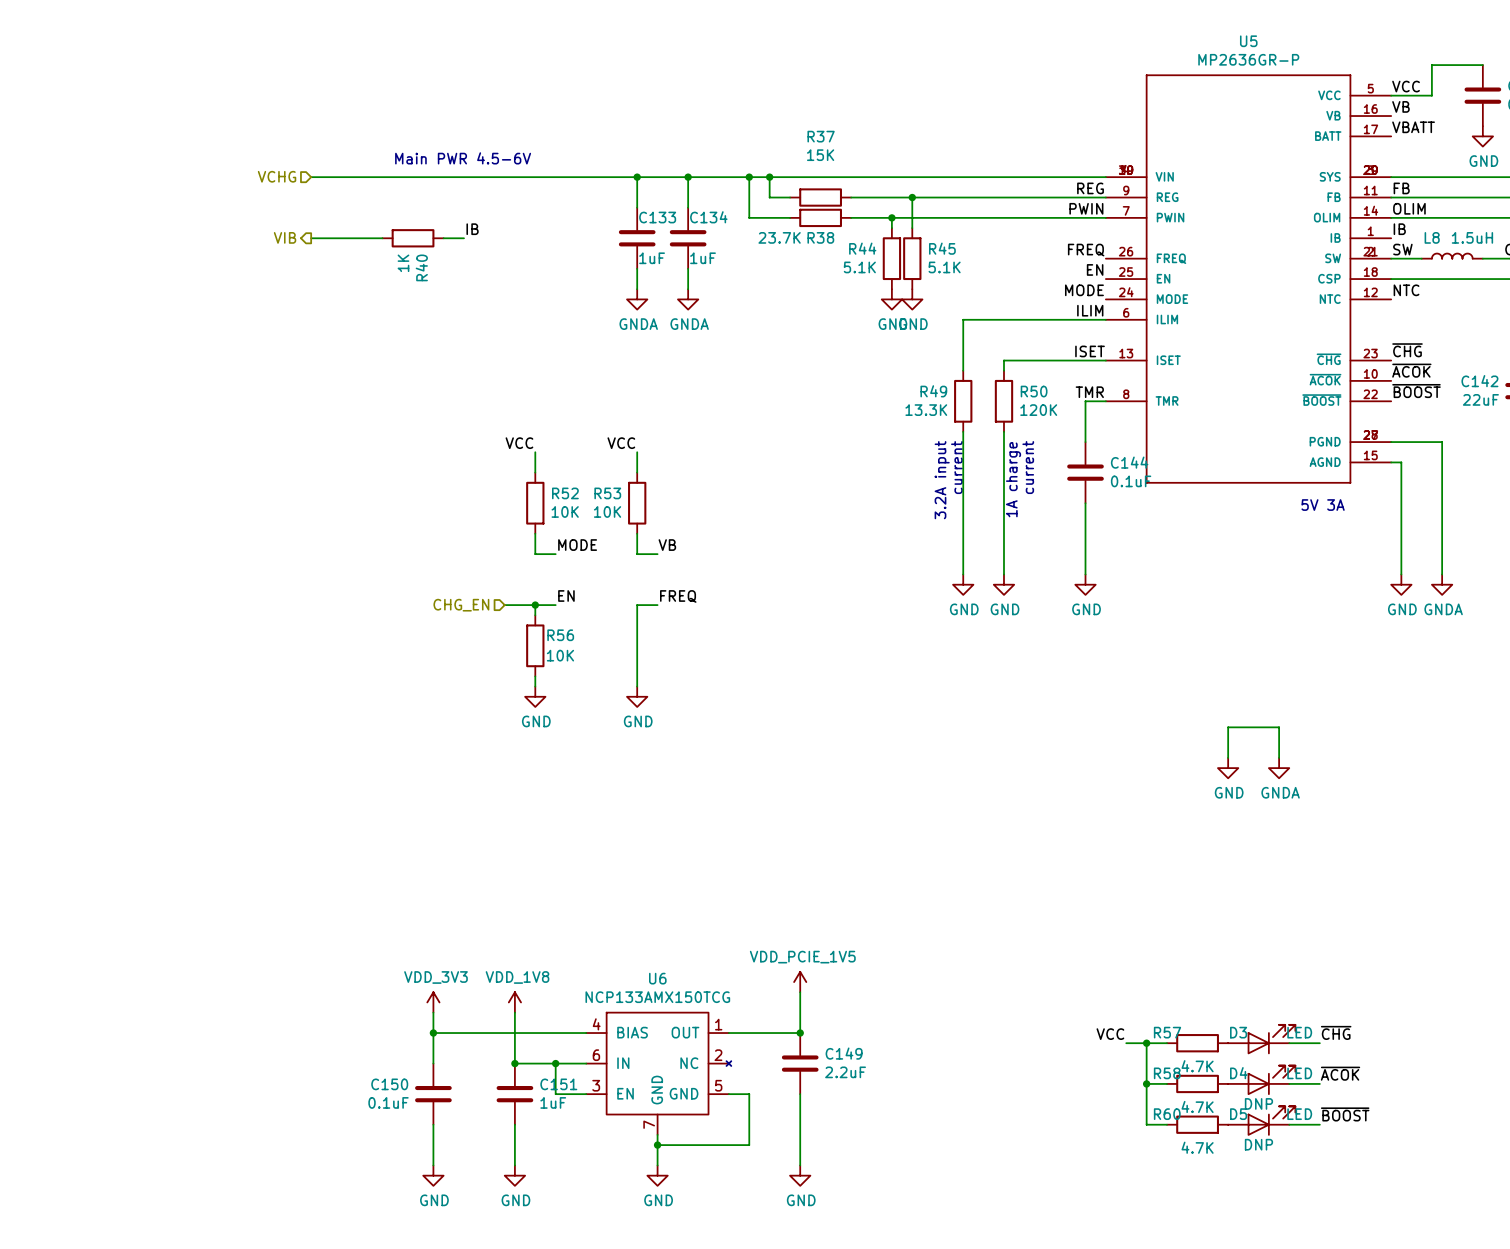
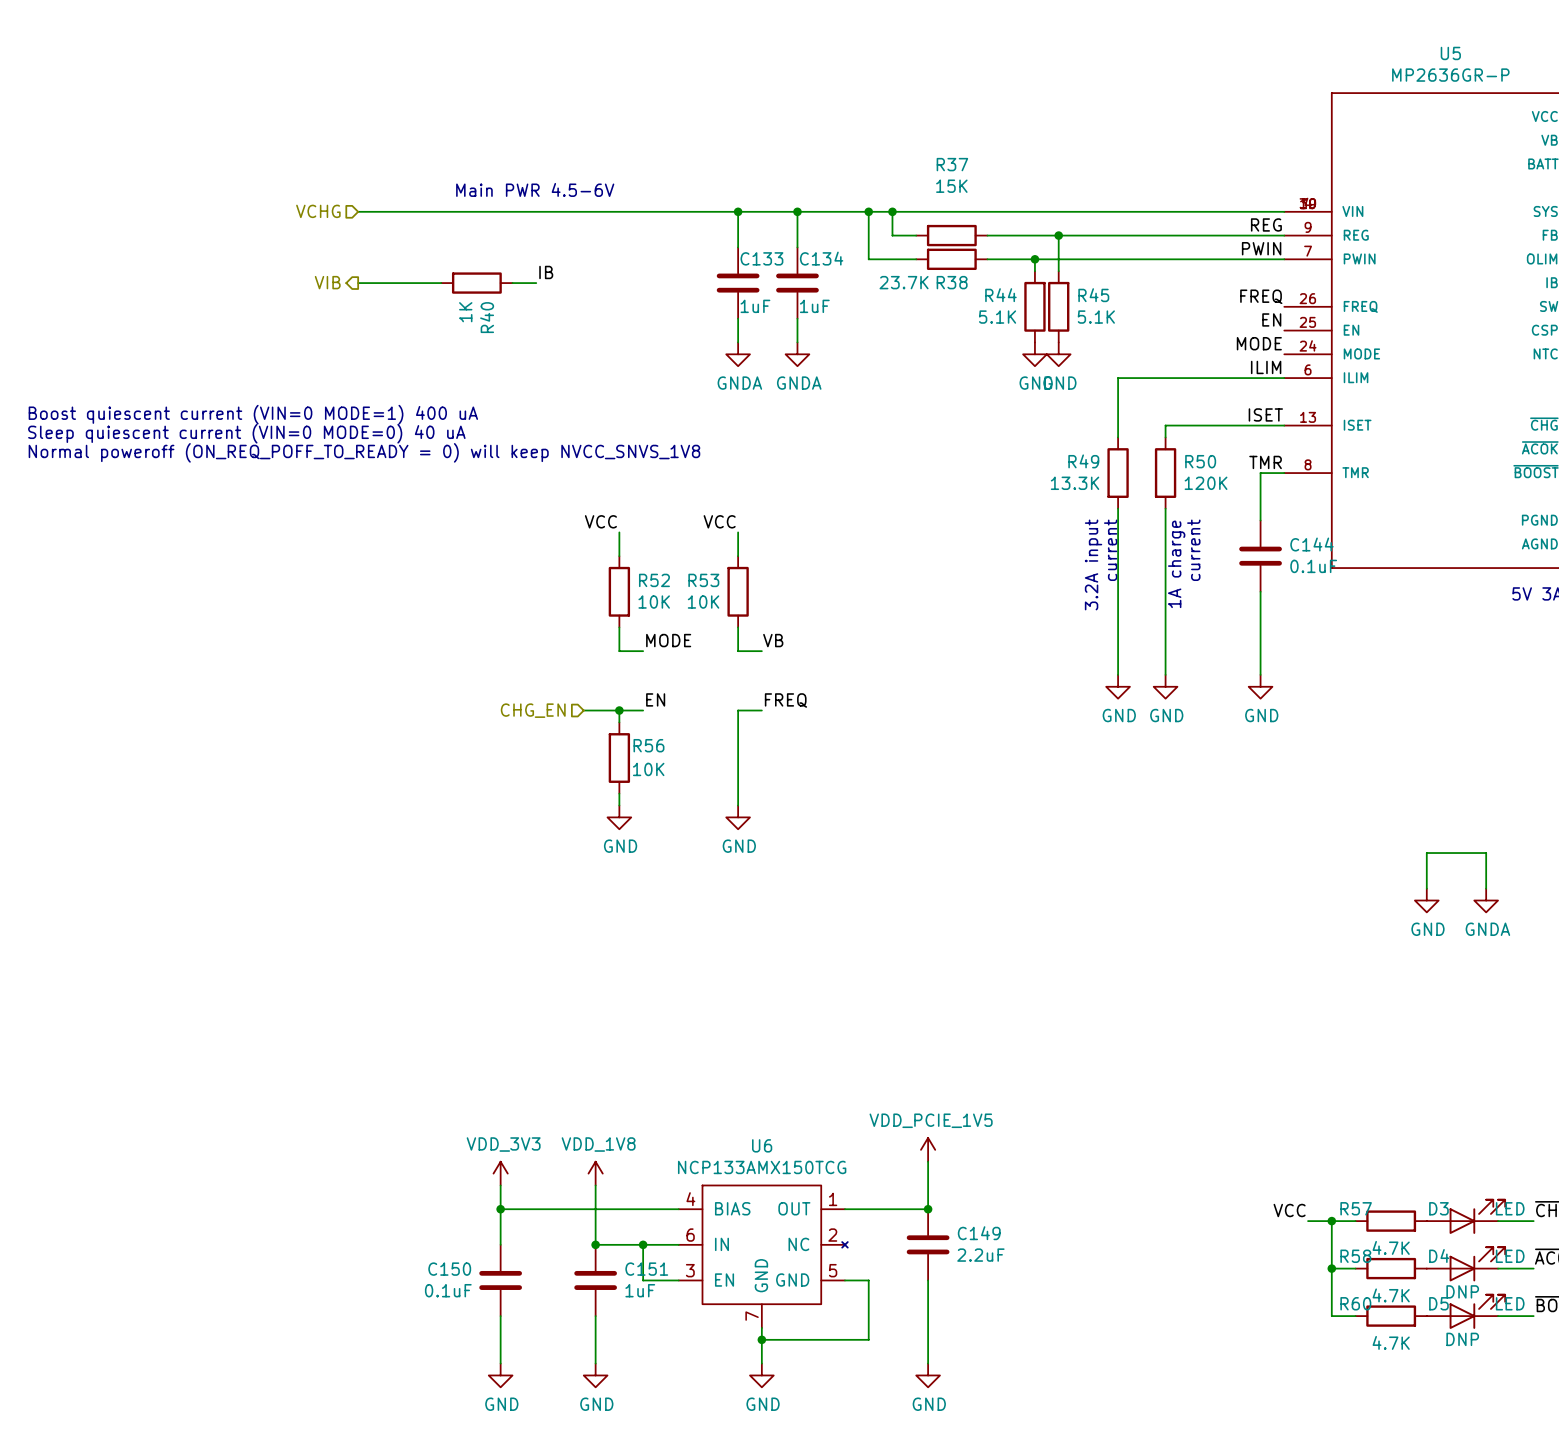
text: none -> Boost quiescent current (VIN=0 MODE=1) 400 uA (253, 414)
text: none -> Sleep quiescent current (VIN=0 MODE=0) 40 uA (246, 433)
text: none -> Normal poweroff (ON_REQ_POFF_TO_READY = 0) will keep NVCC_SNVS_1V8 (364, 452)

